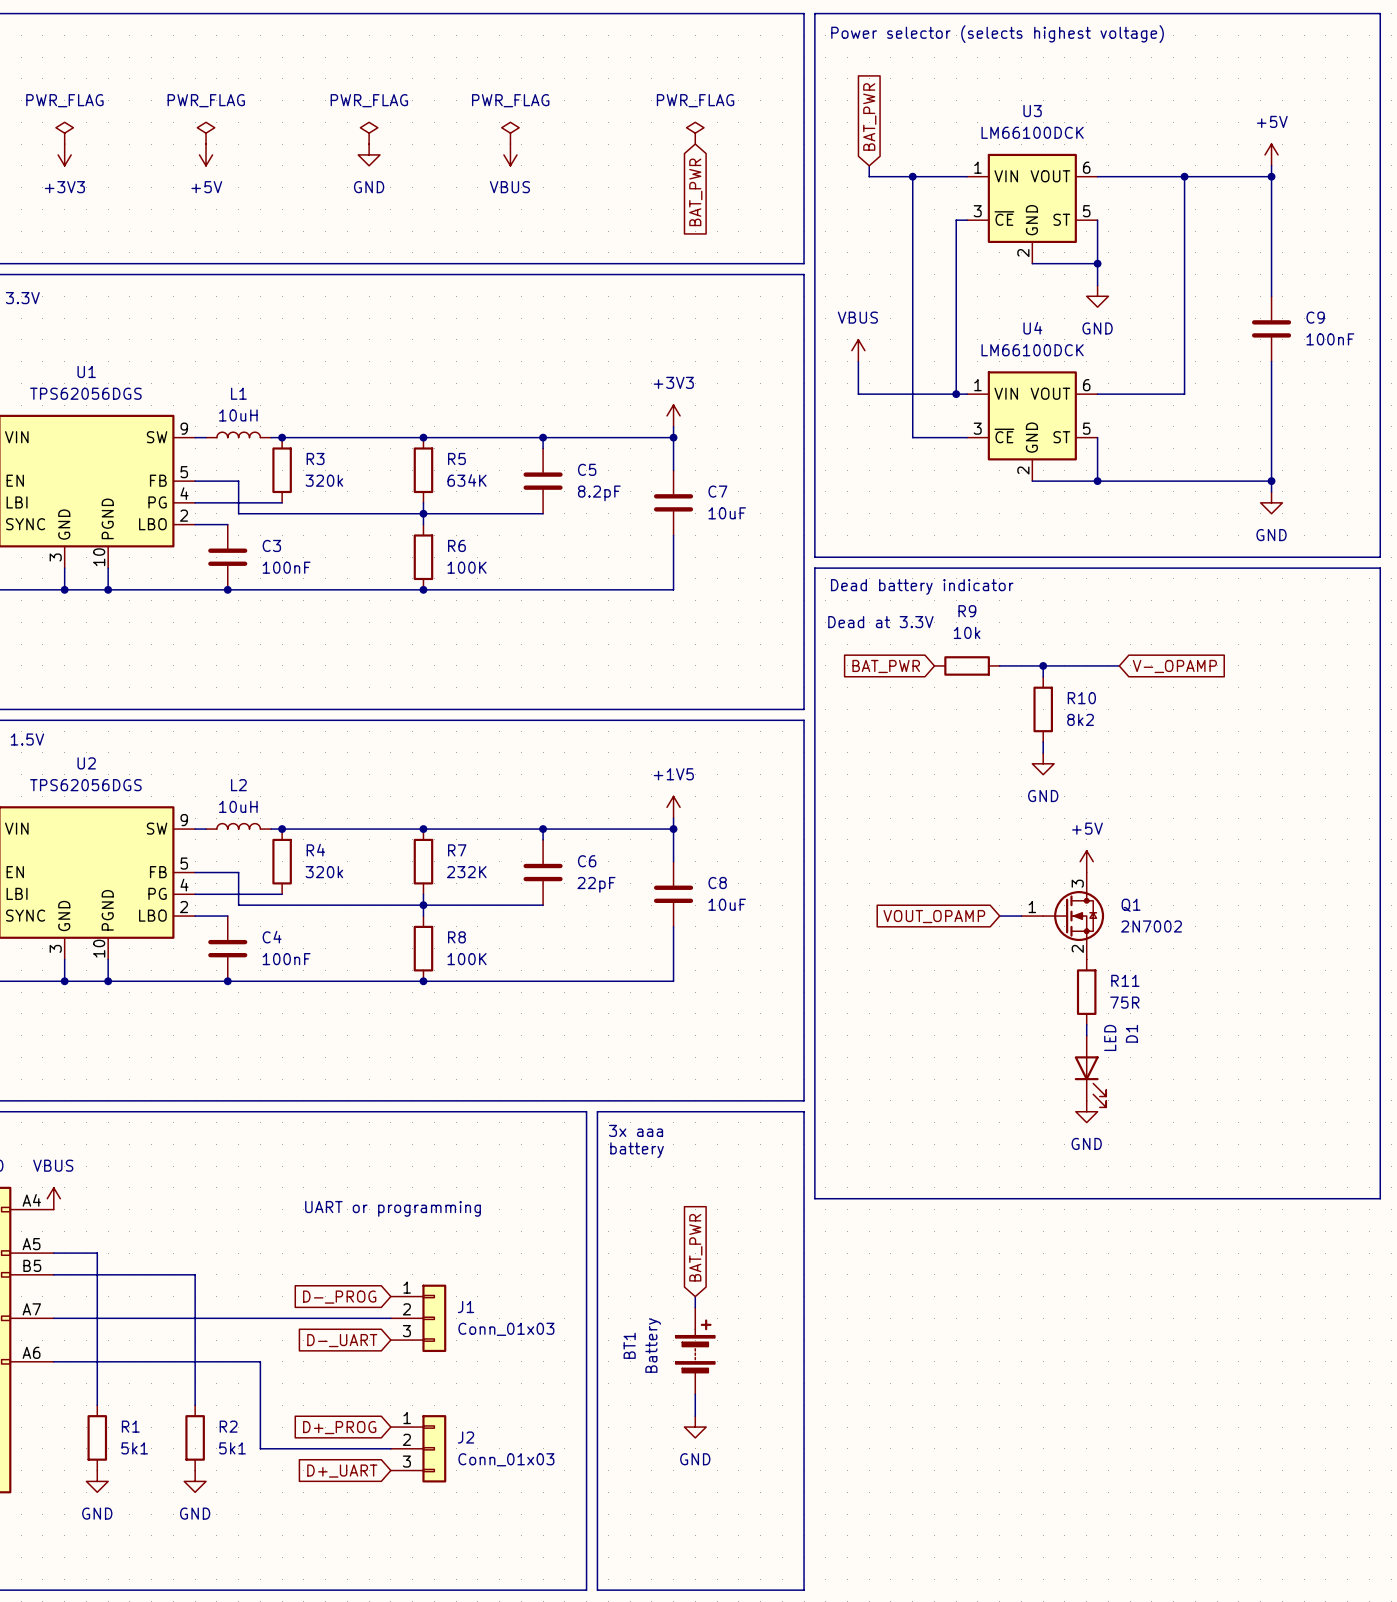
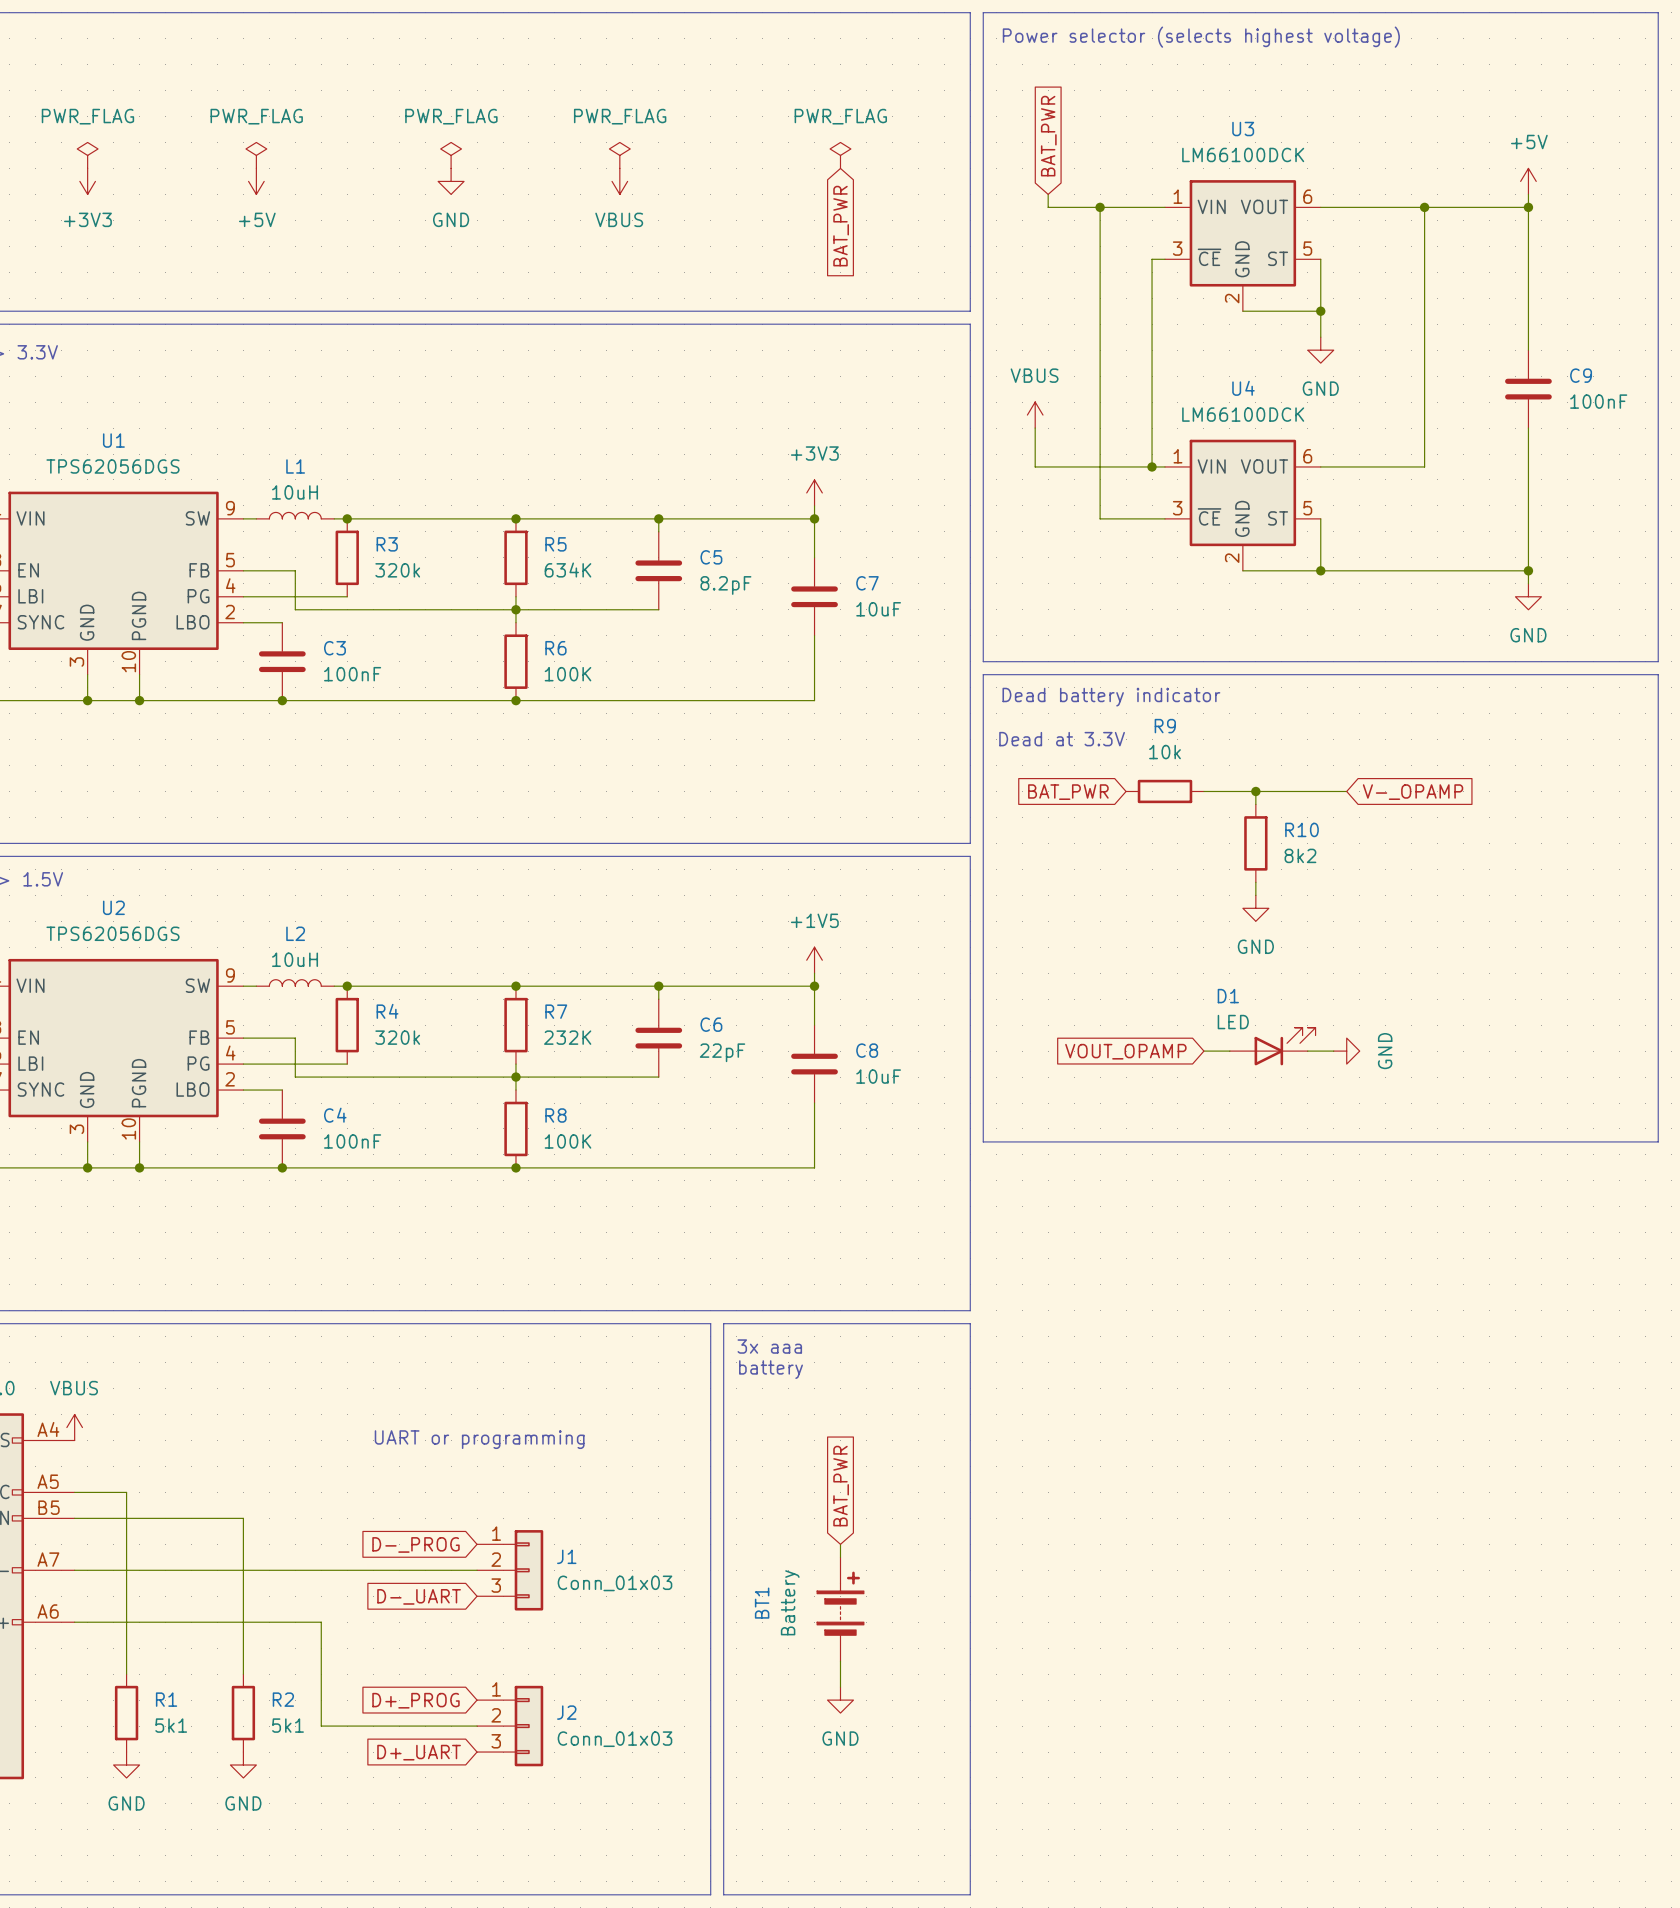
power symbol: +5V (1086, 861) -> none
wire: none -> (1307, 1051) (1333, 1051)
power symbol: none -> GND (1346, 1051)
global label position: VOUT_OPAMP (934, 916) -> VOUT_OPAMP (1125, 1051)
wire: (999, 916) (1021, 916) -> (1203, 1051) (1229, 1051)
Q1: 2N7002 (1062, 916) -> none
line: (814, 959) (814, 1198) (1380, 1198) (1380, 959) -> (983, 1141) (1658, 1141)
R11: 75R (1086, 992) -> none
wire: (1086, 1024) (1086, 1035) -> none
D1 position: (1090, 1071) -> (1272, 1046)
D1 rotation: 0° (1090, 1081) -> 90° counterclockwise (1285, 1046)
power symbol: GND (1086, 1111) -> none

